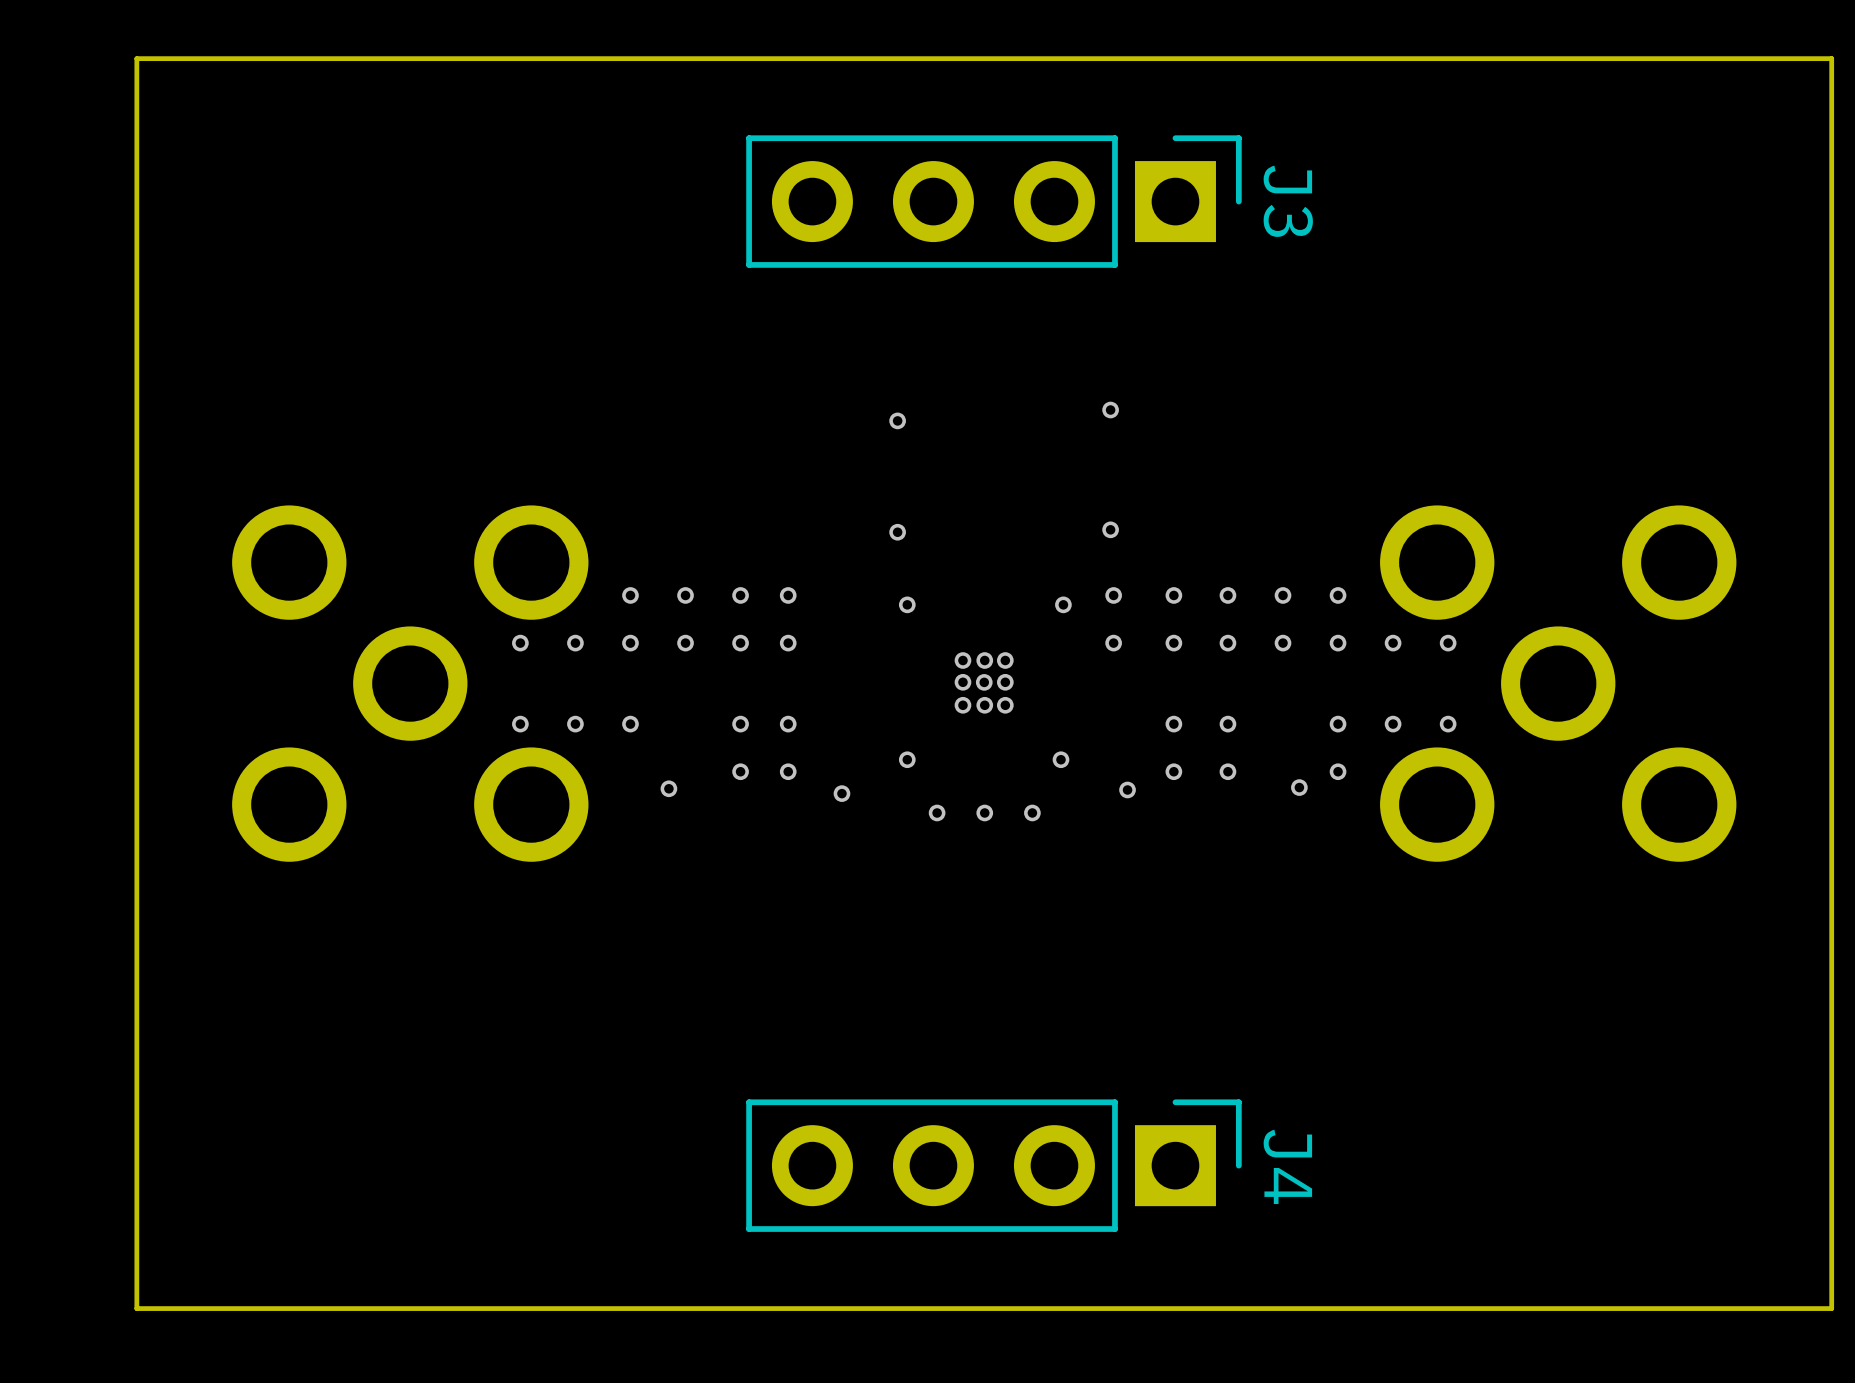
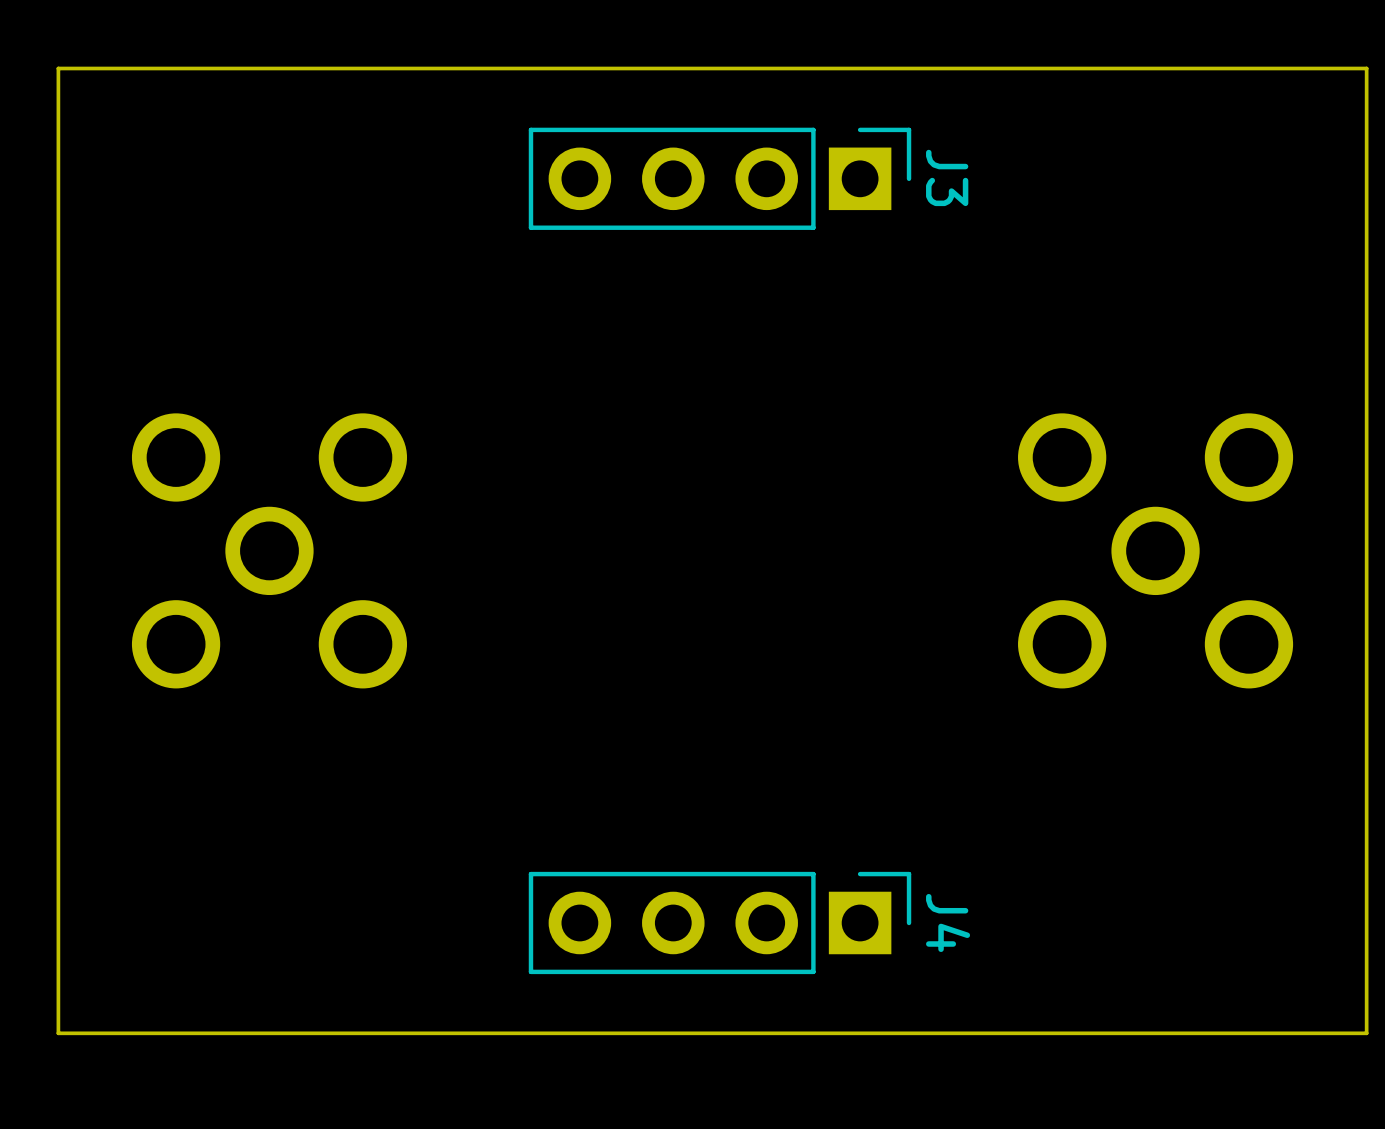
via: (1110, 410) -> none
via: (897, 420) -> none
via: (1110, 529) -> none
via: (897, 532) -> none
via: (630, 595) -> none
via: (685, 595) -> none
via: (740, 595) -> none
via: (788, 595) -> none
via: (1113, 595) -> none
via: (1173, 595) -> none
via: (1227, 595) -> none
via: (1283, 595) -> none
via: (1338, 595) -> none
via: (907, 604) -> none
via: (1063, 604) -> none
via: (520, 643) -> none
via: (575, 643) -> none
via: (630, 643) -> none
via: (685, 643) -> none
via: (740, 643) -> none
via: (788, 643) -> none
via: (1113, 643) -> none
via: (1173, 643) -> none
via: (1227, 643) -> none
via: (1283, 643) -> none
via: (1338, 643) -> none
via: (1393, 643) -> none
via: (1448, 643) -> none
via: (962, 660) -> none
via: (984, 660) -> none
via: (1005, 660) -> none
via: (962, 682) -> none
via: (984, 682) -> none
via: (1005, 682) -> none
via: (962, 705) -> none
via: (984, 705) -> none
via: (1005, 705) -> none
via: (520, 724) -> none
via: (575, 724) -> none
via: (630, 724) -> none
via: (740, 724) -> none
via: (788, 724) -> none
via: (1173, 724) -> none
via: (1227, 724) -> none
via: (1338, 724) -> none
via: (1393, 724) -> none
via: (1448, 724) -> none
via: (907, 759) -> none
via: (1060, 759) -> none
via: (740, 771) -> none
via: (788, 771) -> none
via: (1173, 771) -> none
via: (1227, 771) -> none
via: (1338, 771) -> none
via: (1299, 787) -> none
via: (668, 788) -> none
via: (1127, 789) -> none
via: (841, 793) -> none
via: (937, 812) -> none
via: (984, 812) -> none
via: (1032, 812) -> none

